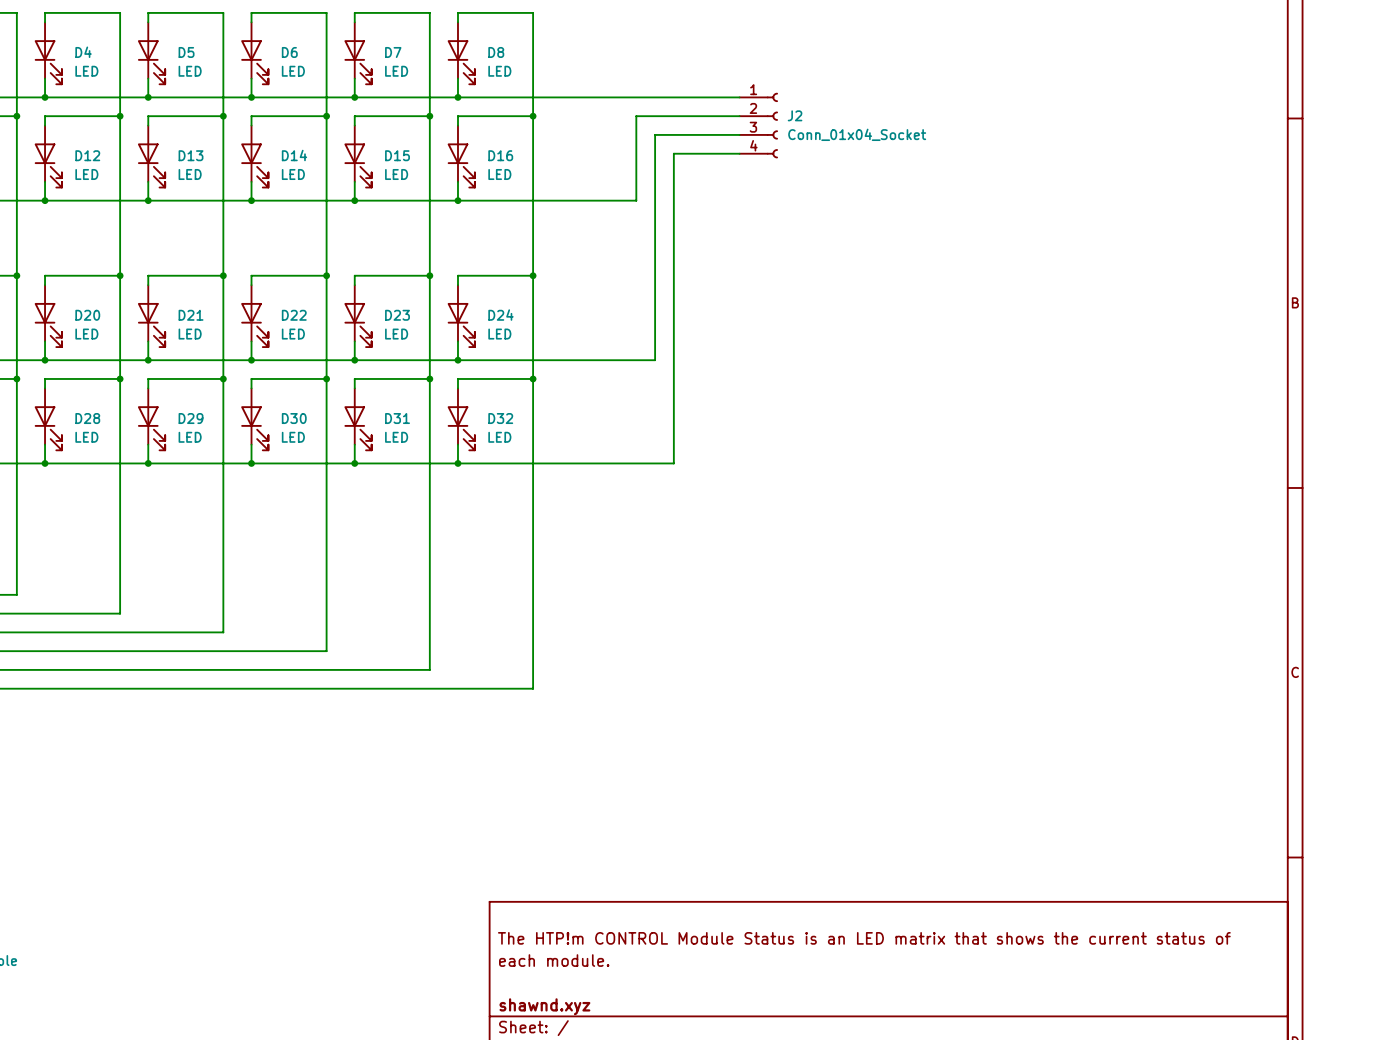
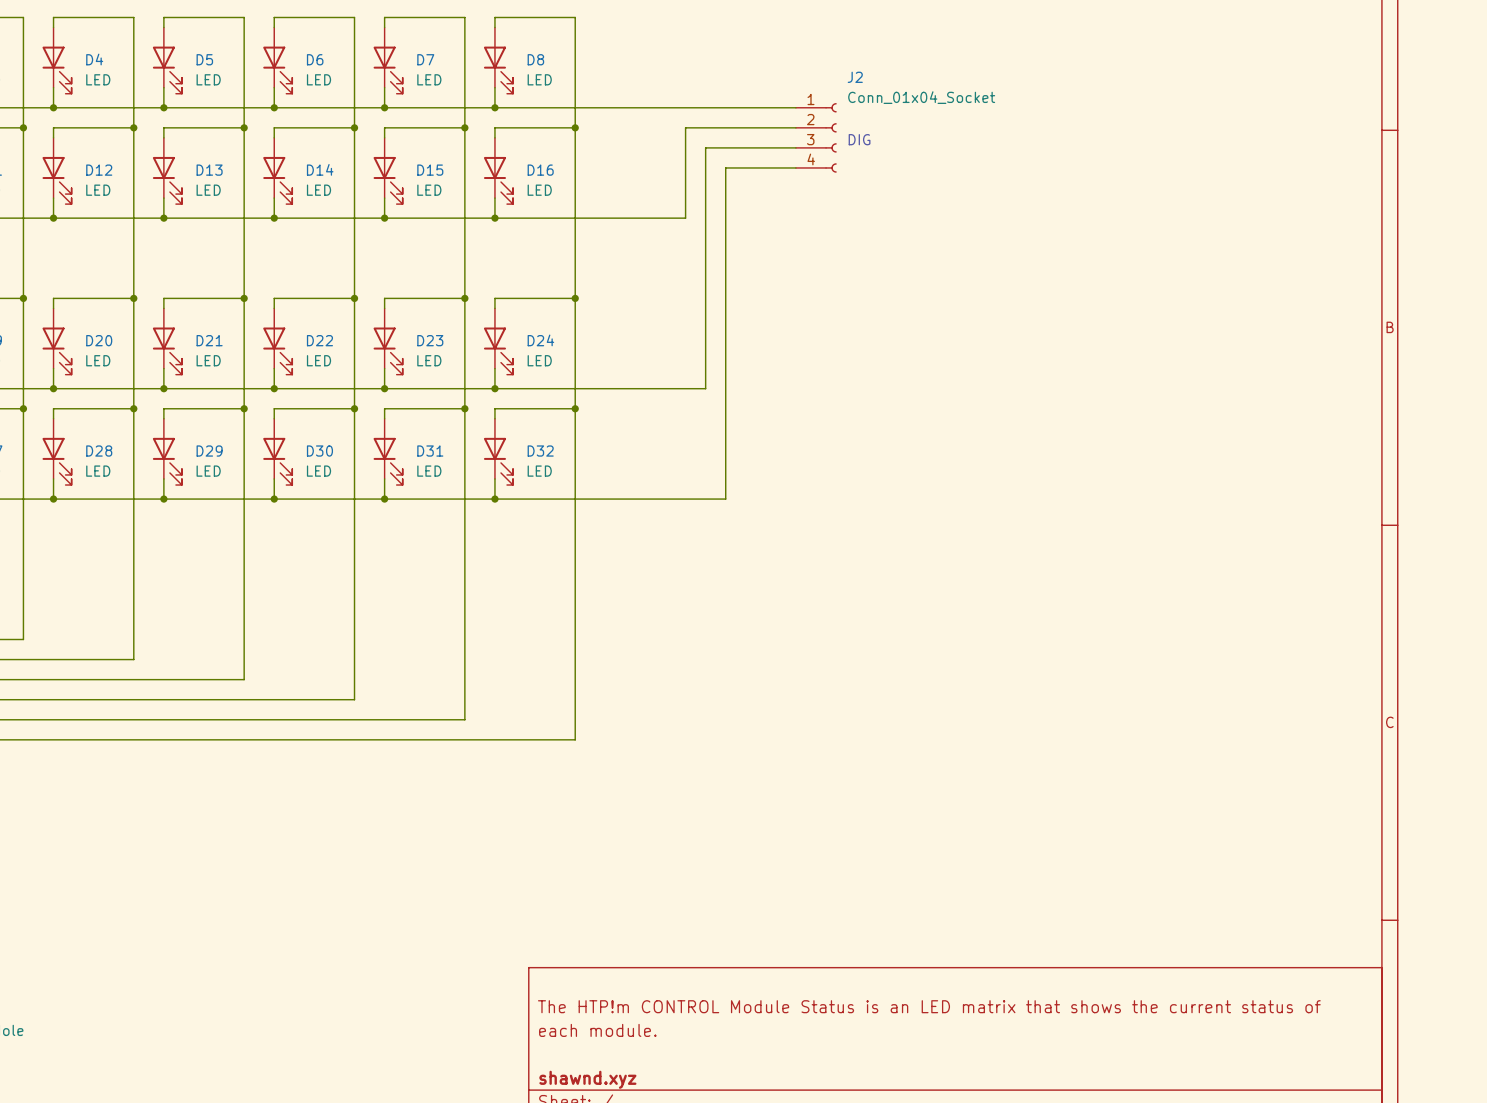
J2 name position: J2 (795, 115) -> J2 (855, 77)
text: none -> DIG (859, 139)
J2 value position: Conn_01x04_Socket (857, 134) -> Conn_01x04_Socket (921, 97)

